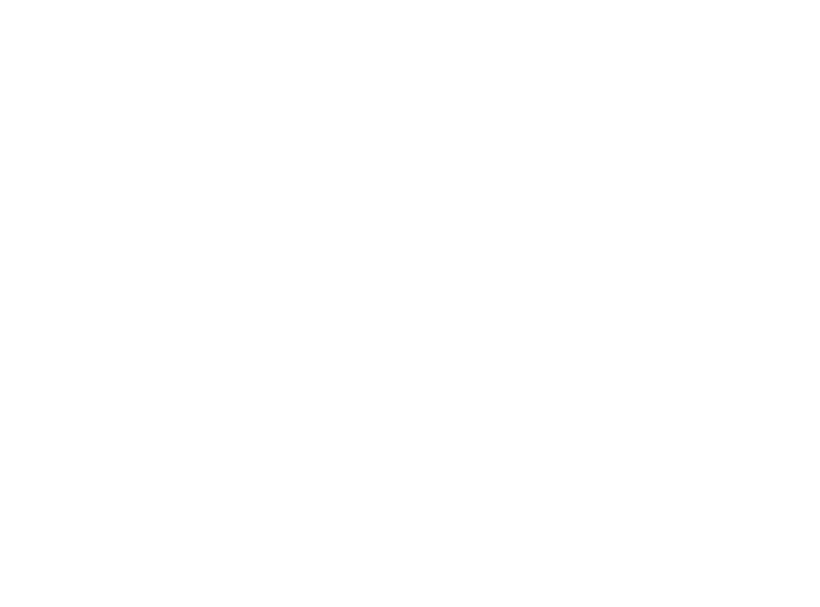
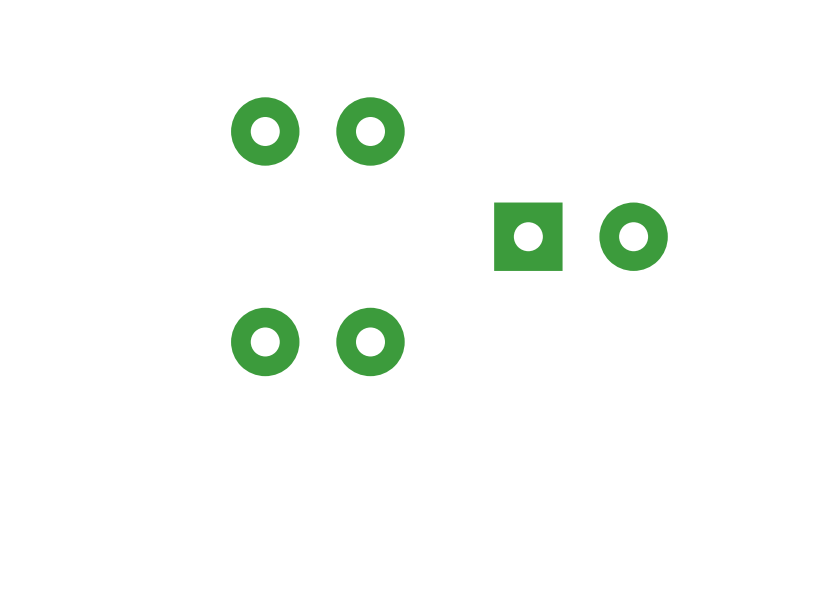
part: none -> (317, 131)
part: none -> (580, 236)
part: none -> (317, 341)

